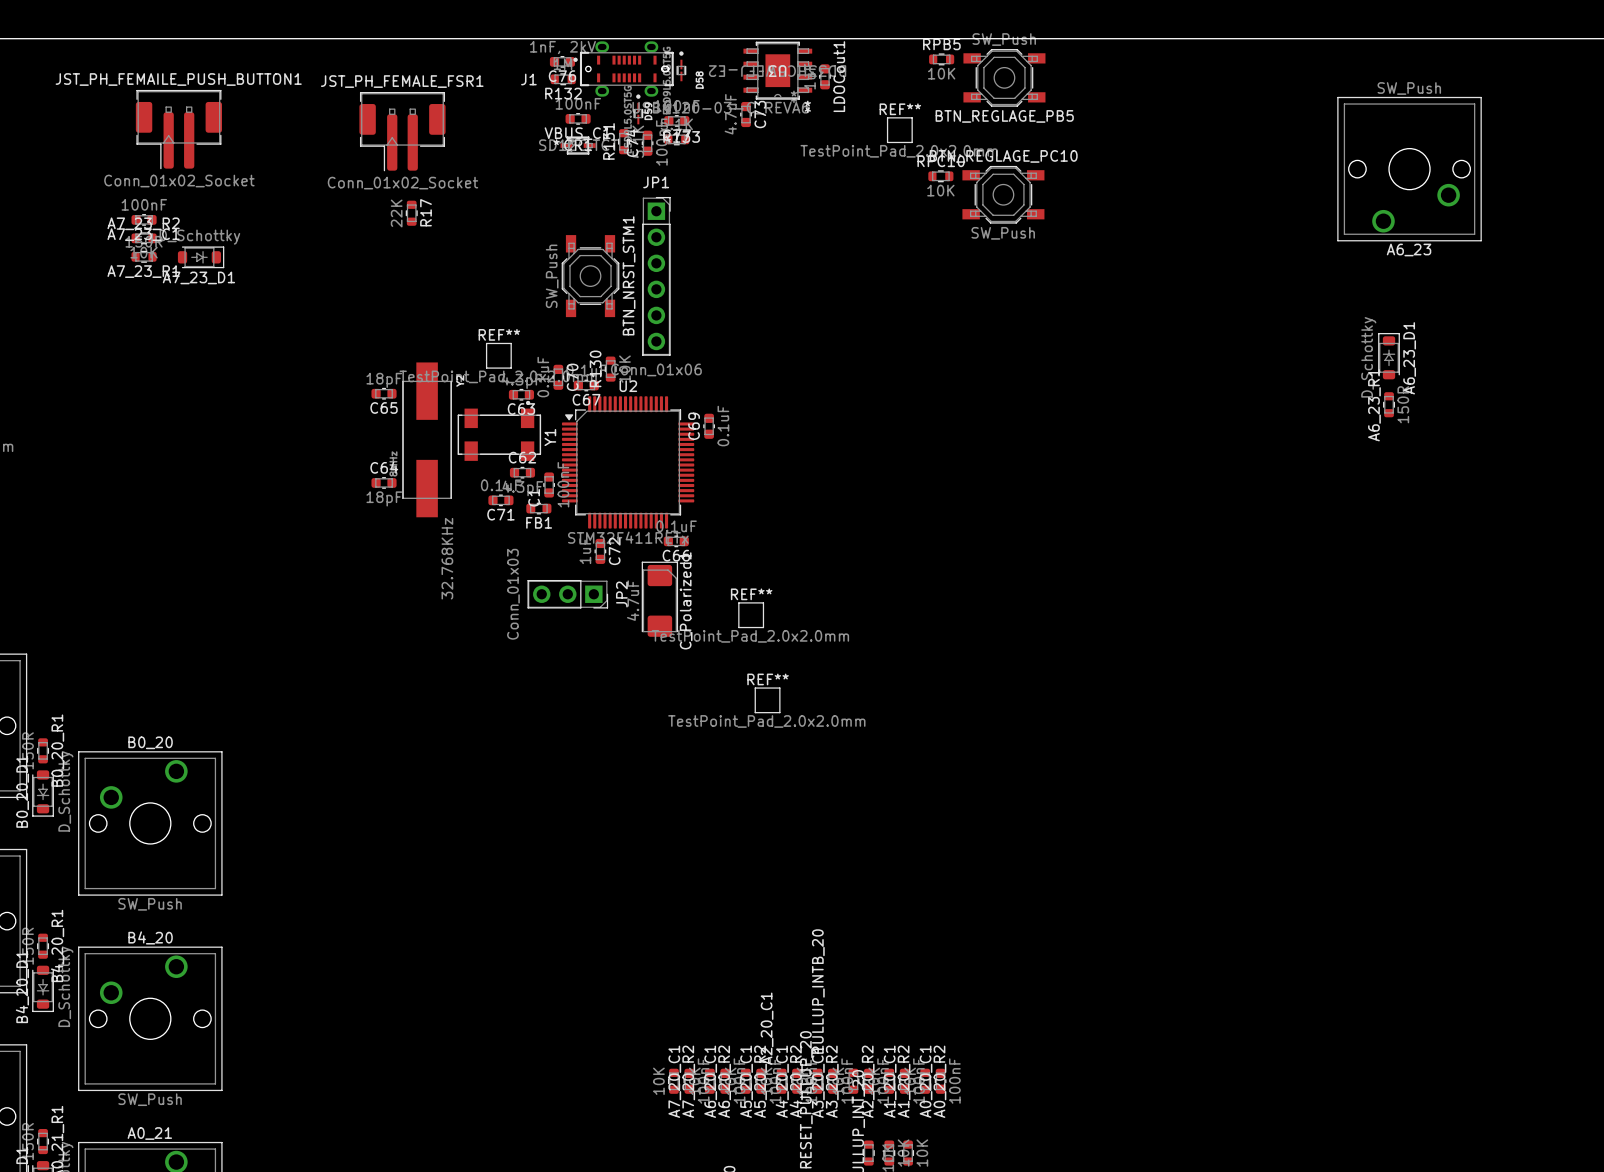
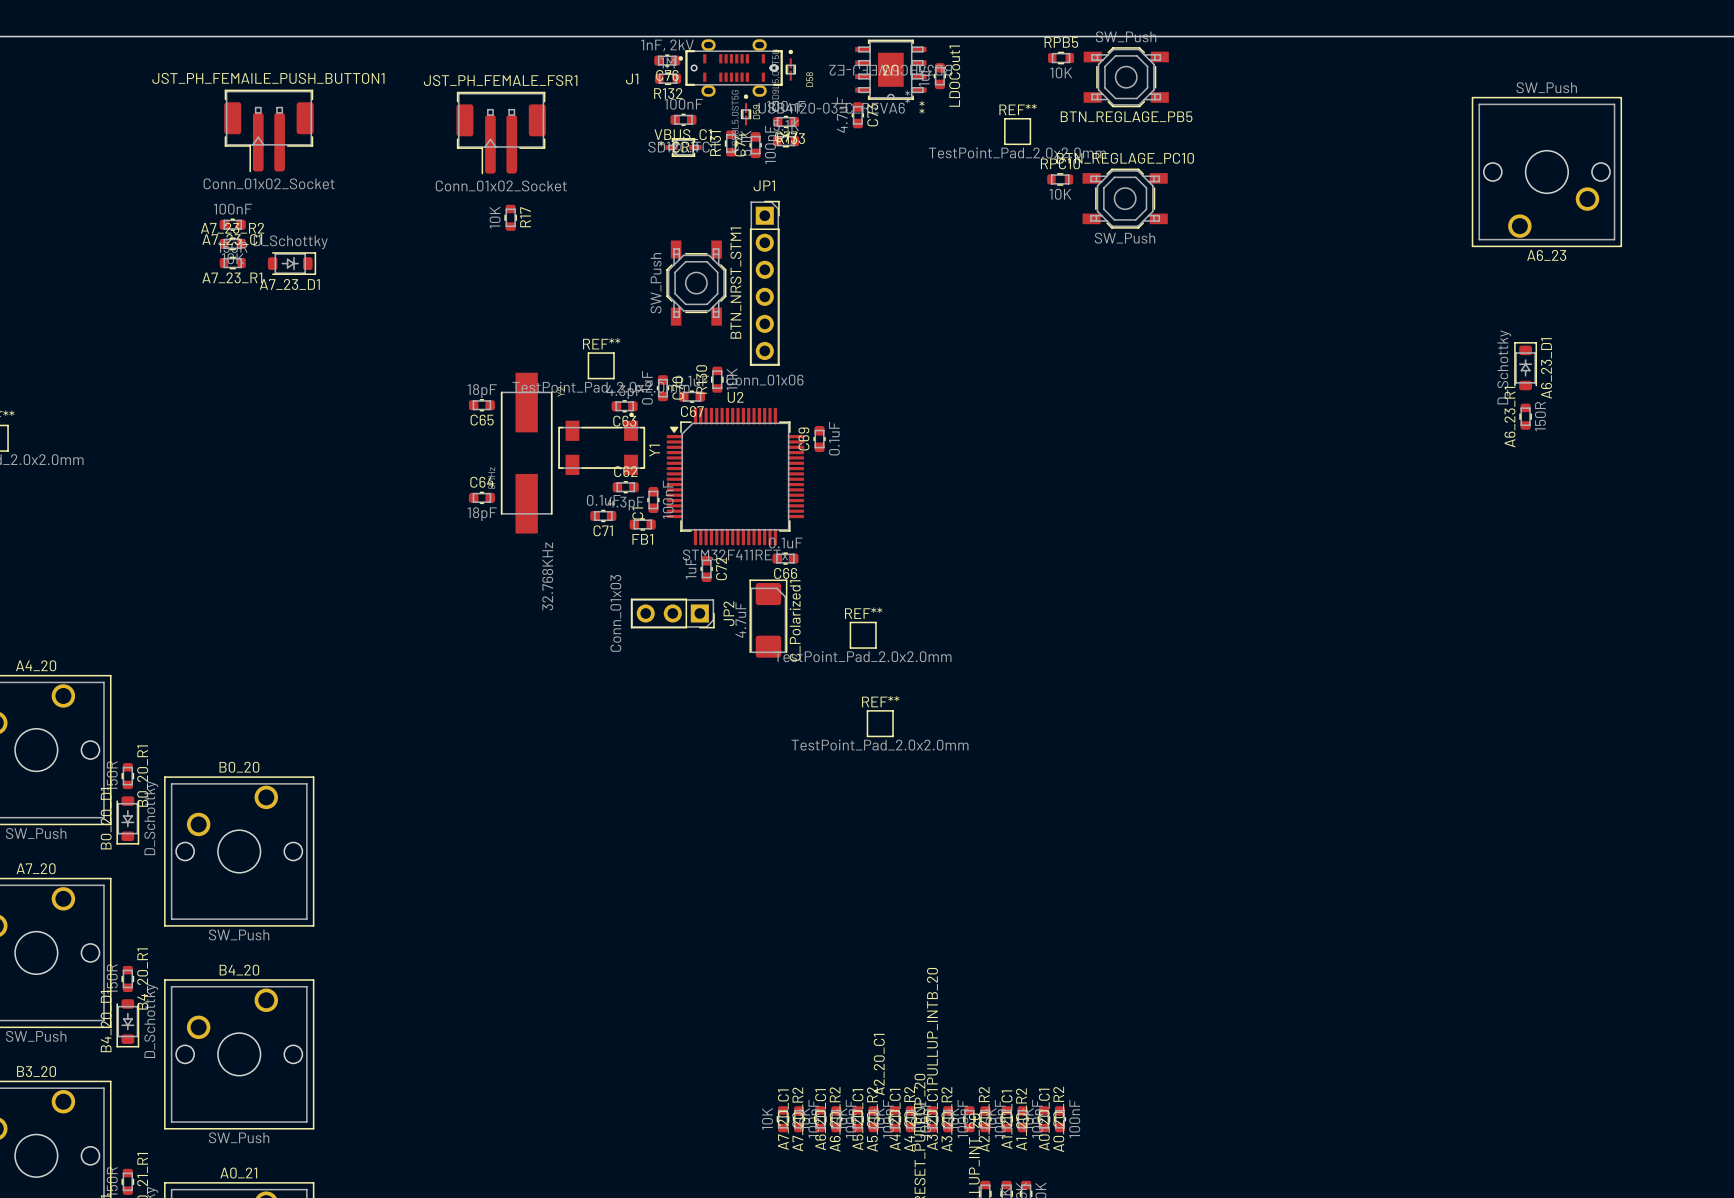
R17 value: 22K (396, 213) -> 10K (495, 217)

